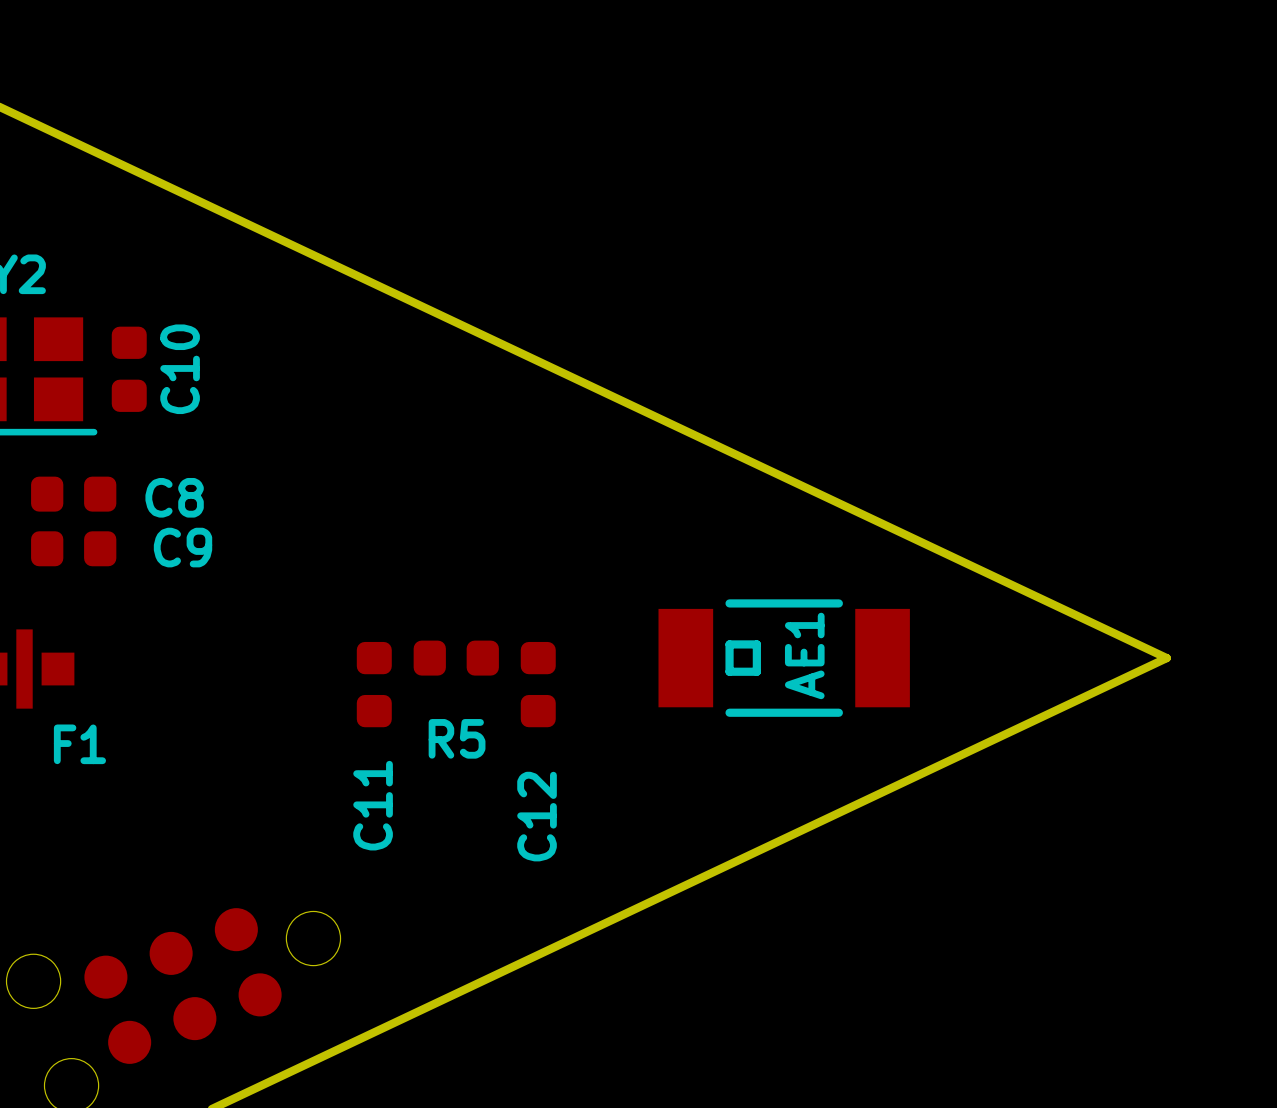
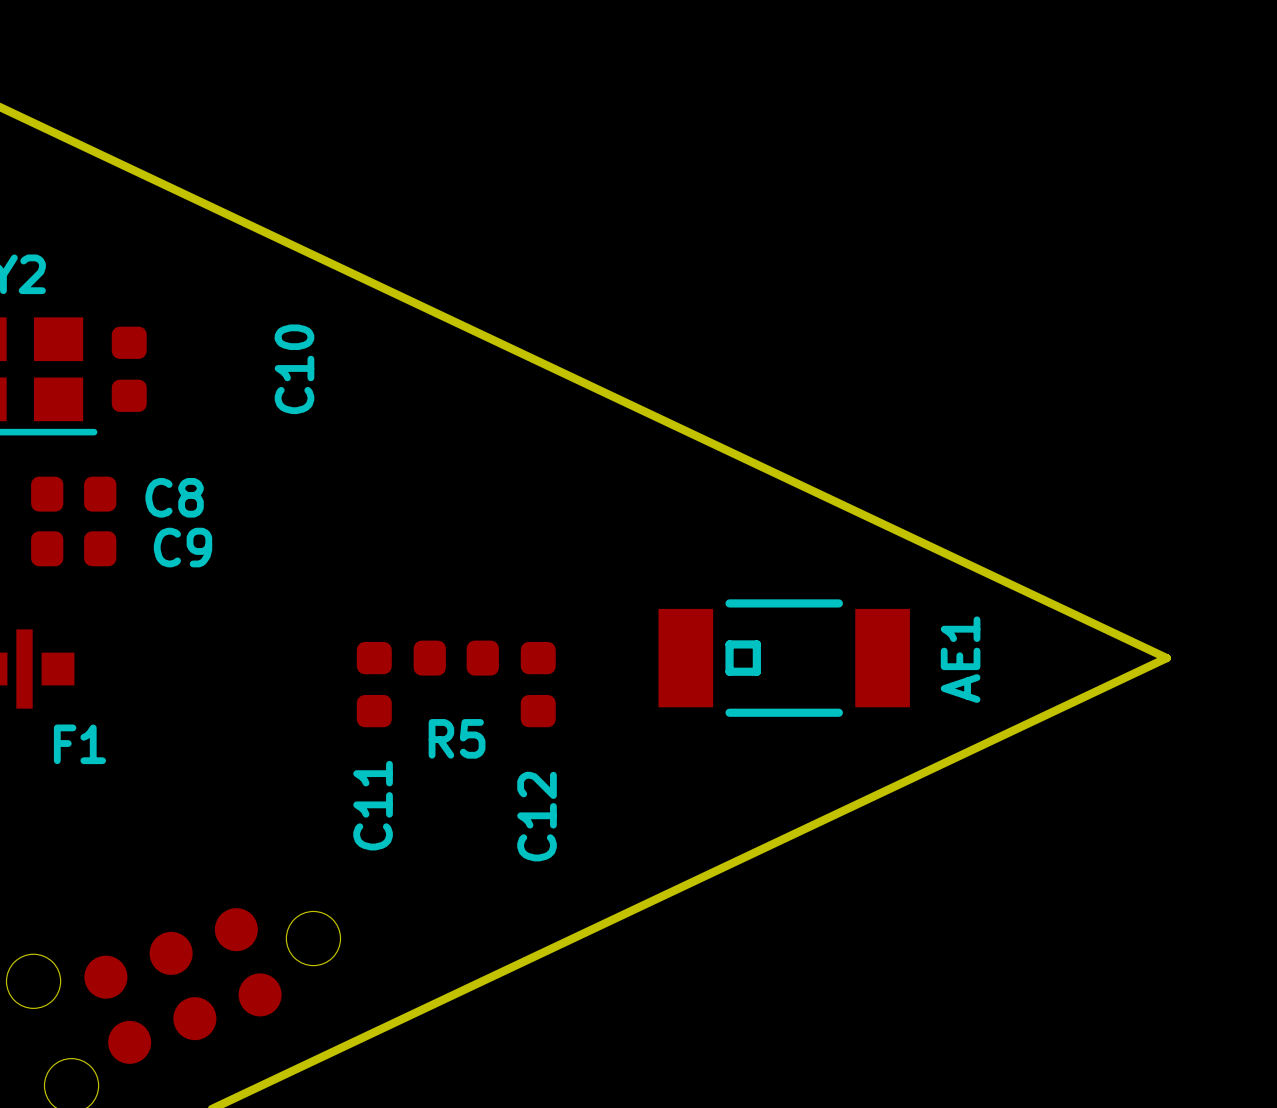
C10 name position: C10 (180, 369) -> C10 (294, 369)
AE1 name position: AE1 (804, 655) -> AE1 (960, 659)

